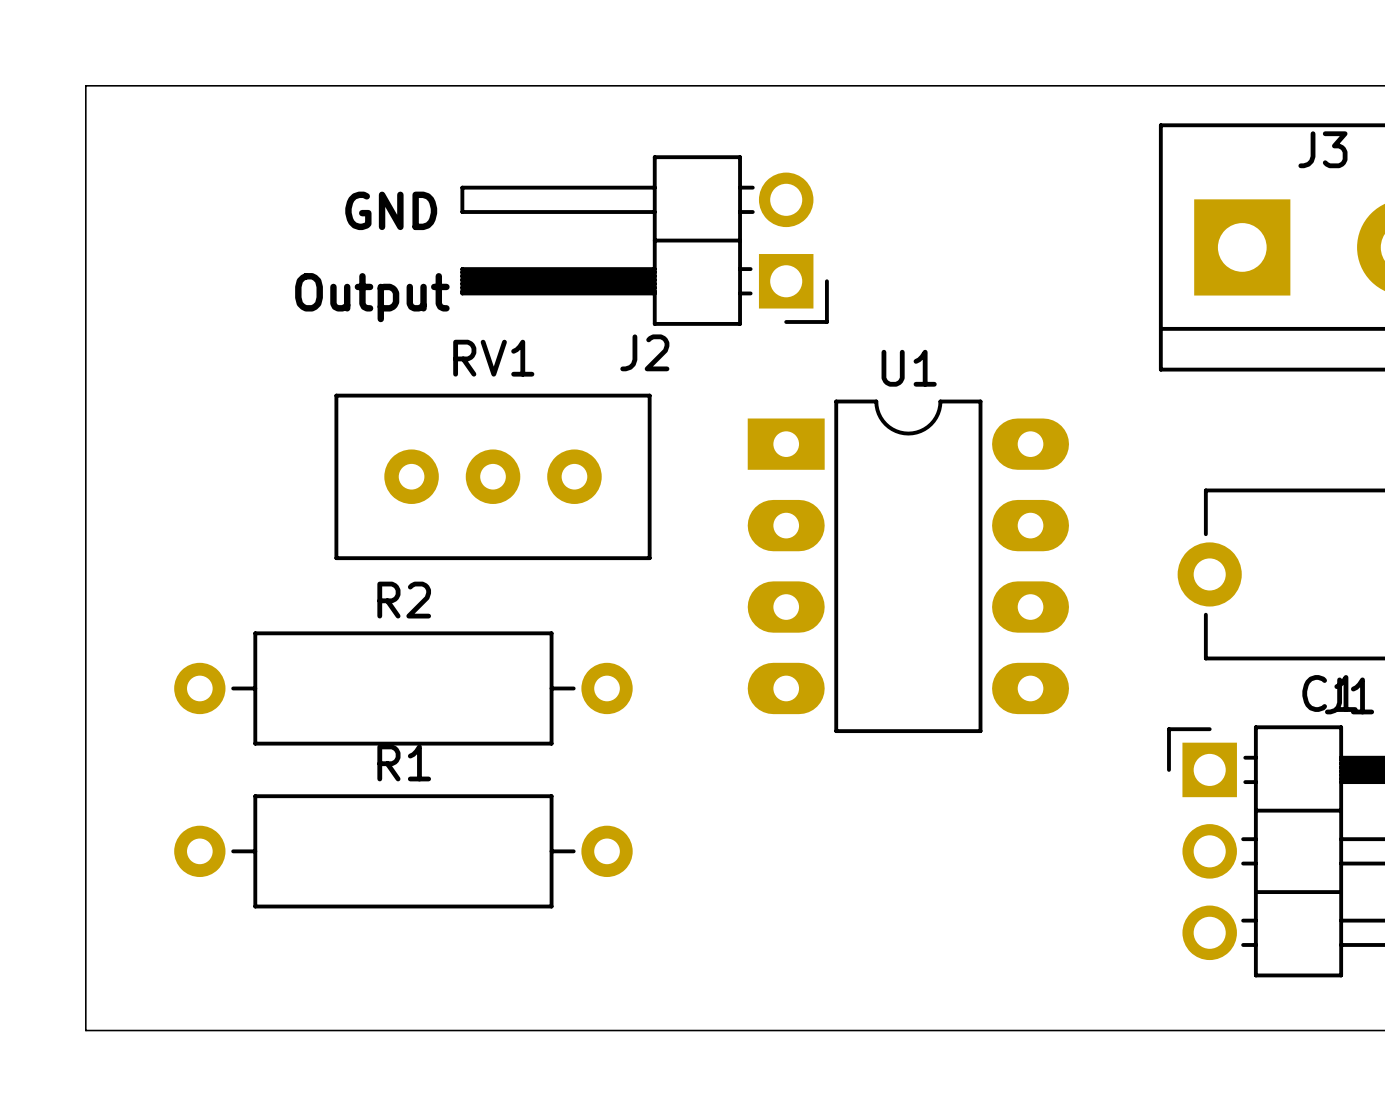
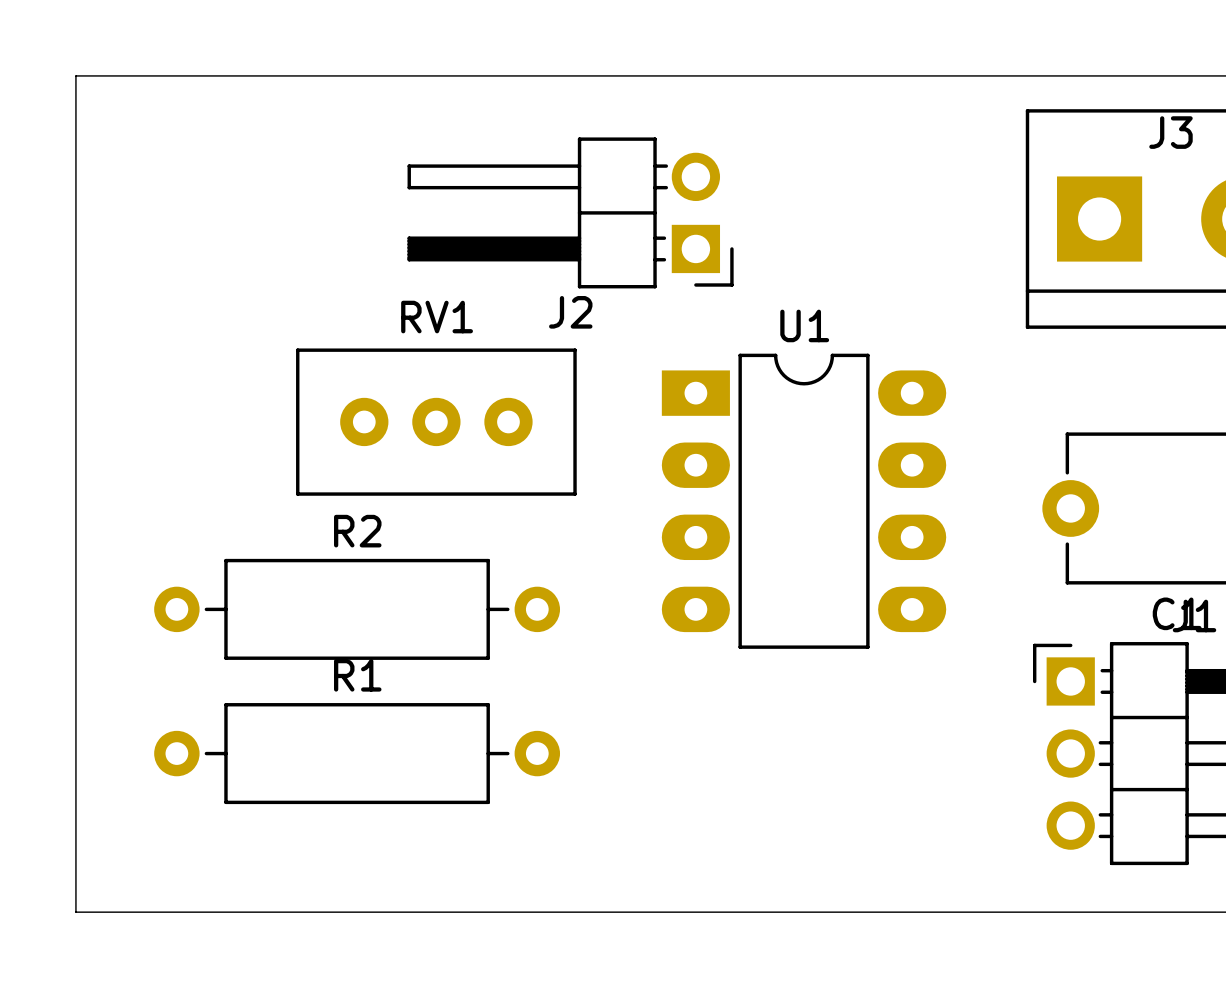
text: GND (391, 210) -> none
text: Output (372, 297) -> none

